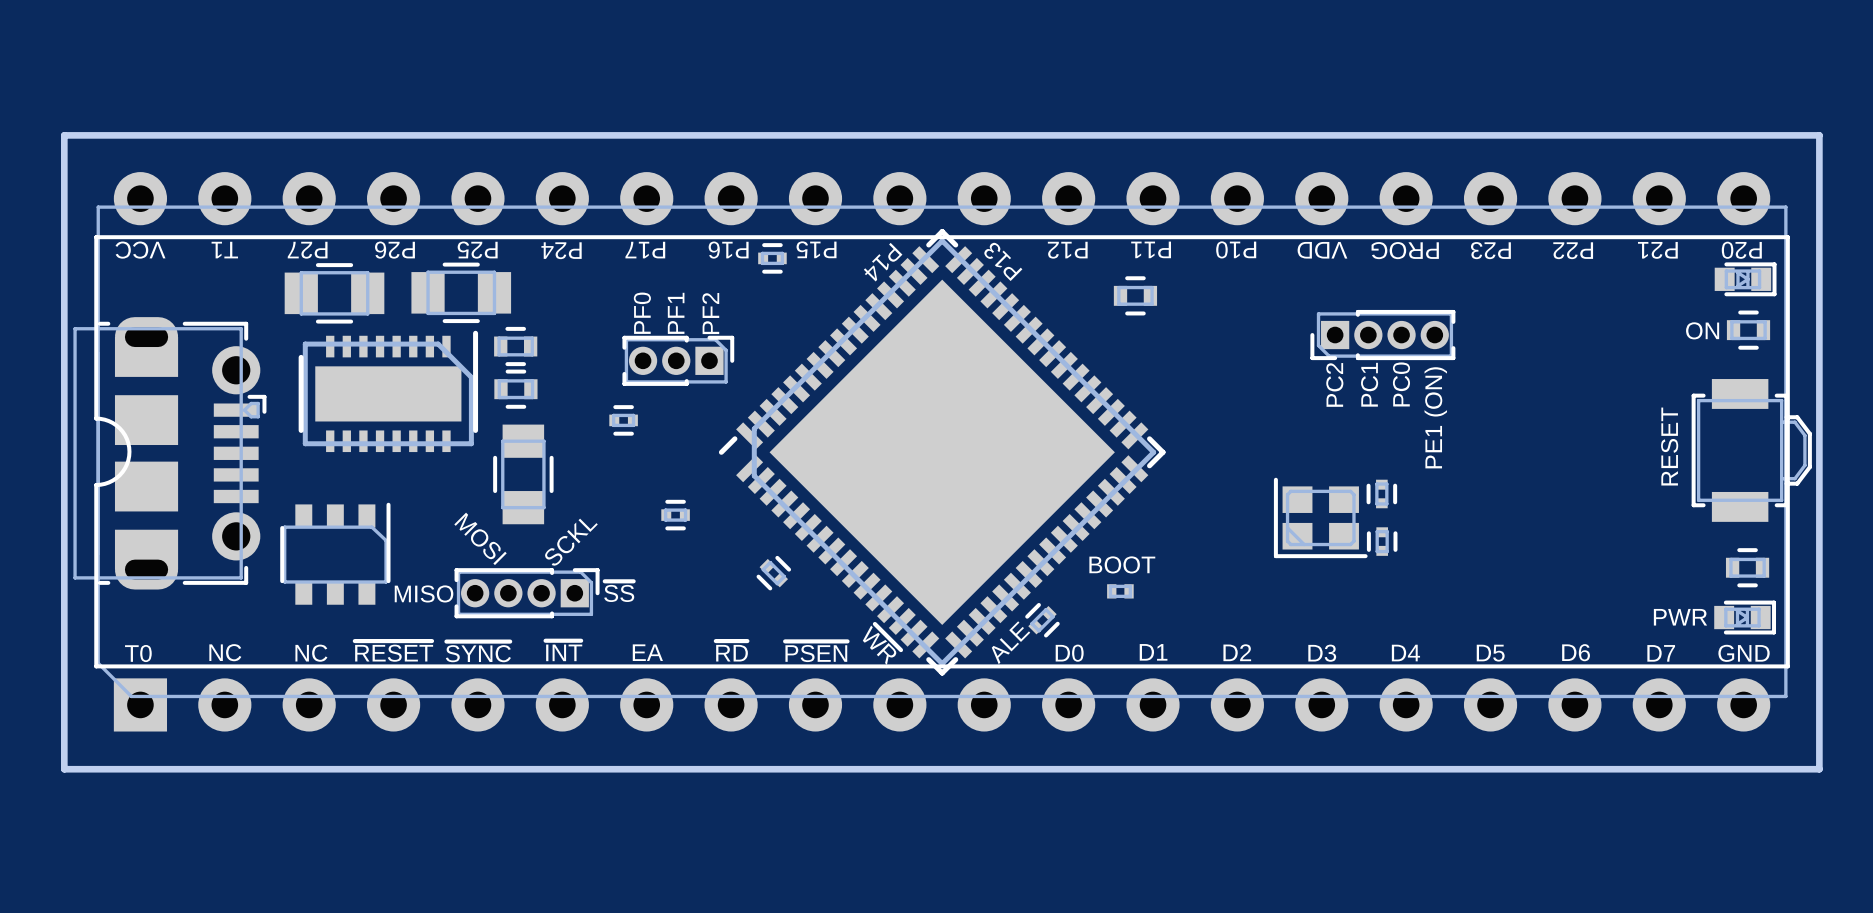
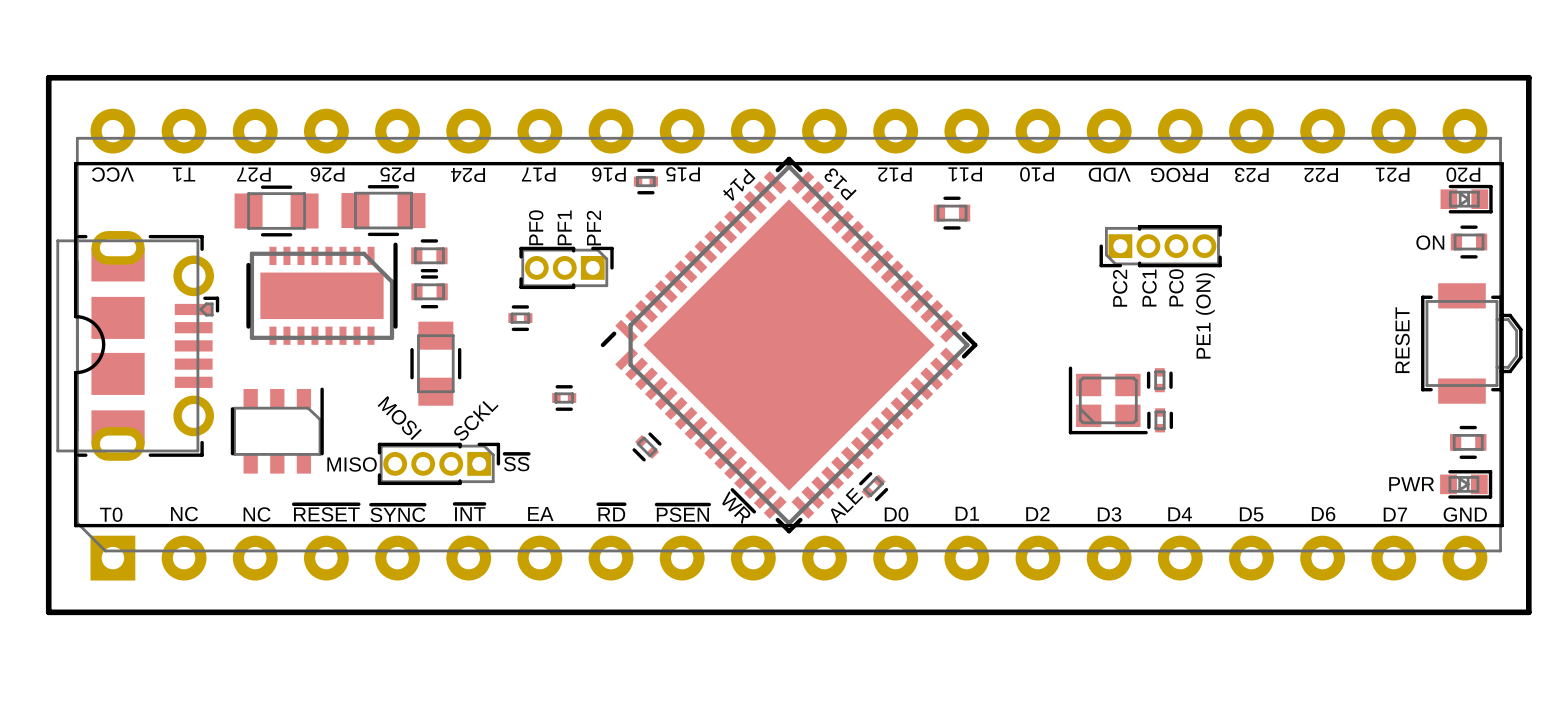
text: BOOT (1122, 564) -> none
part: (1120, 591) -> none

